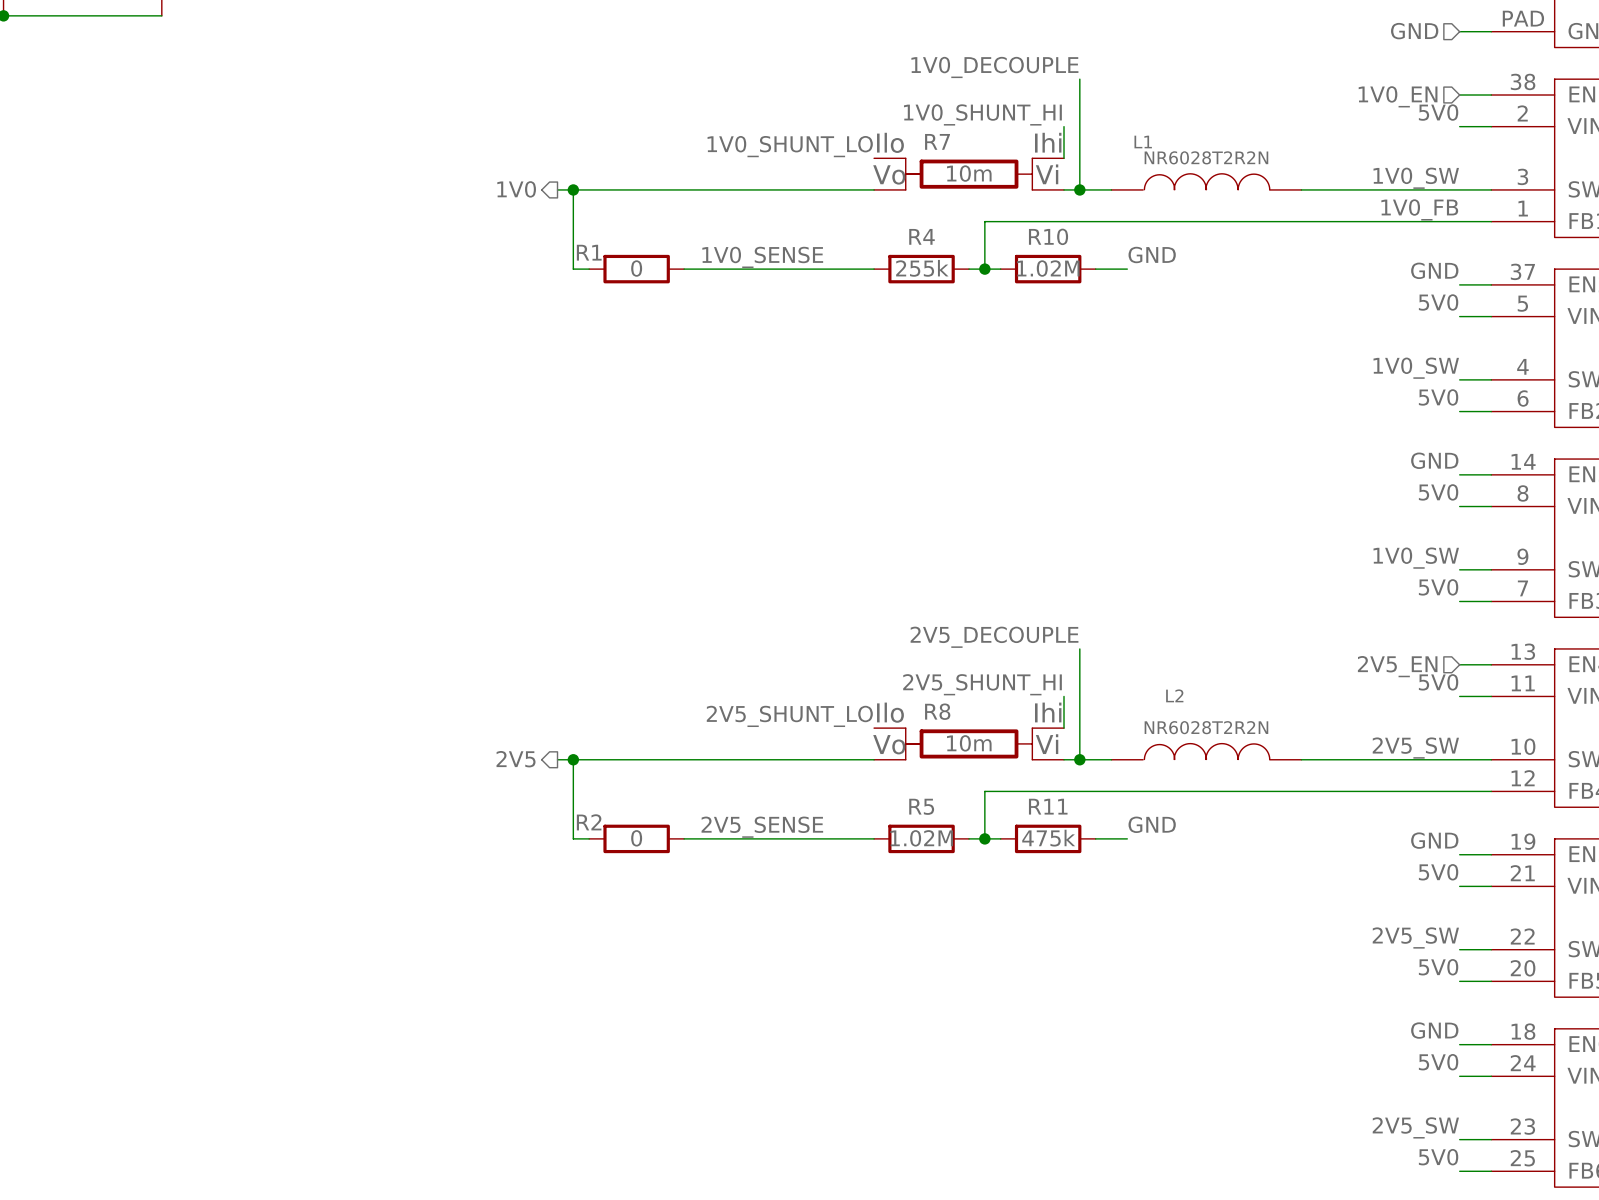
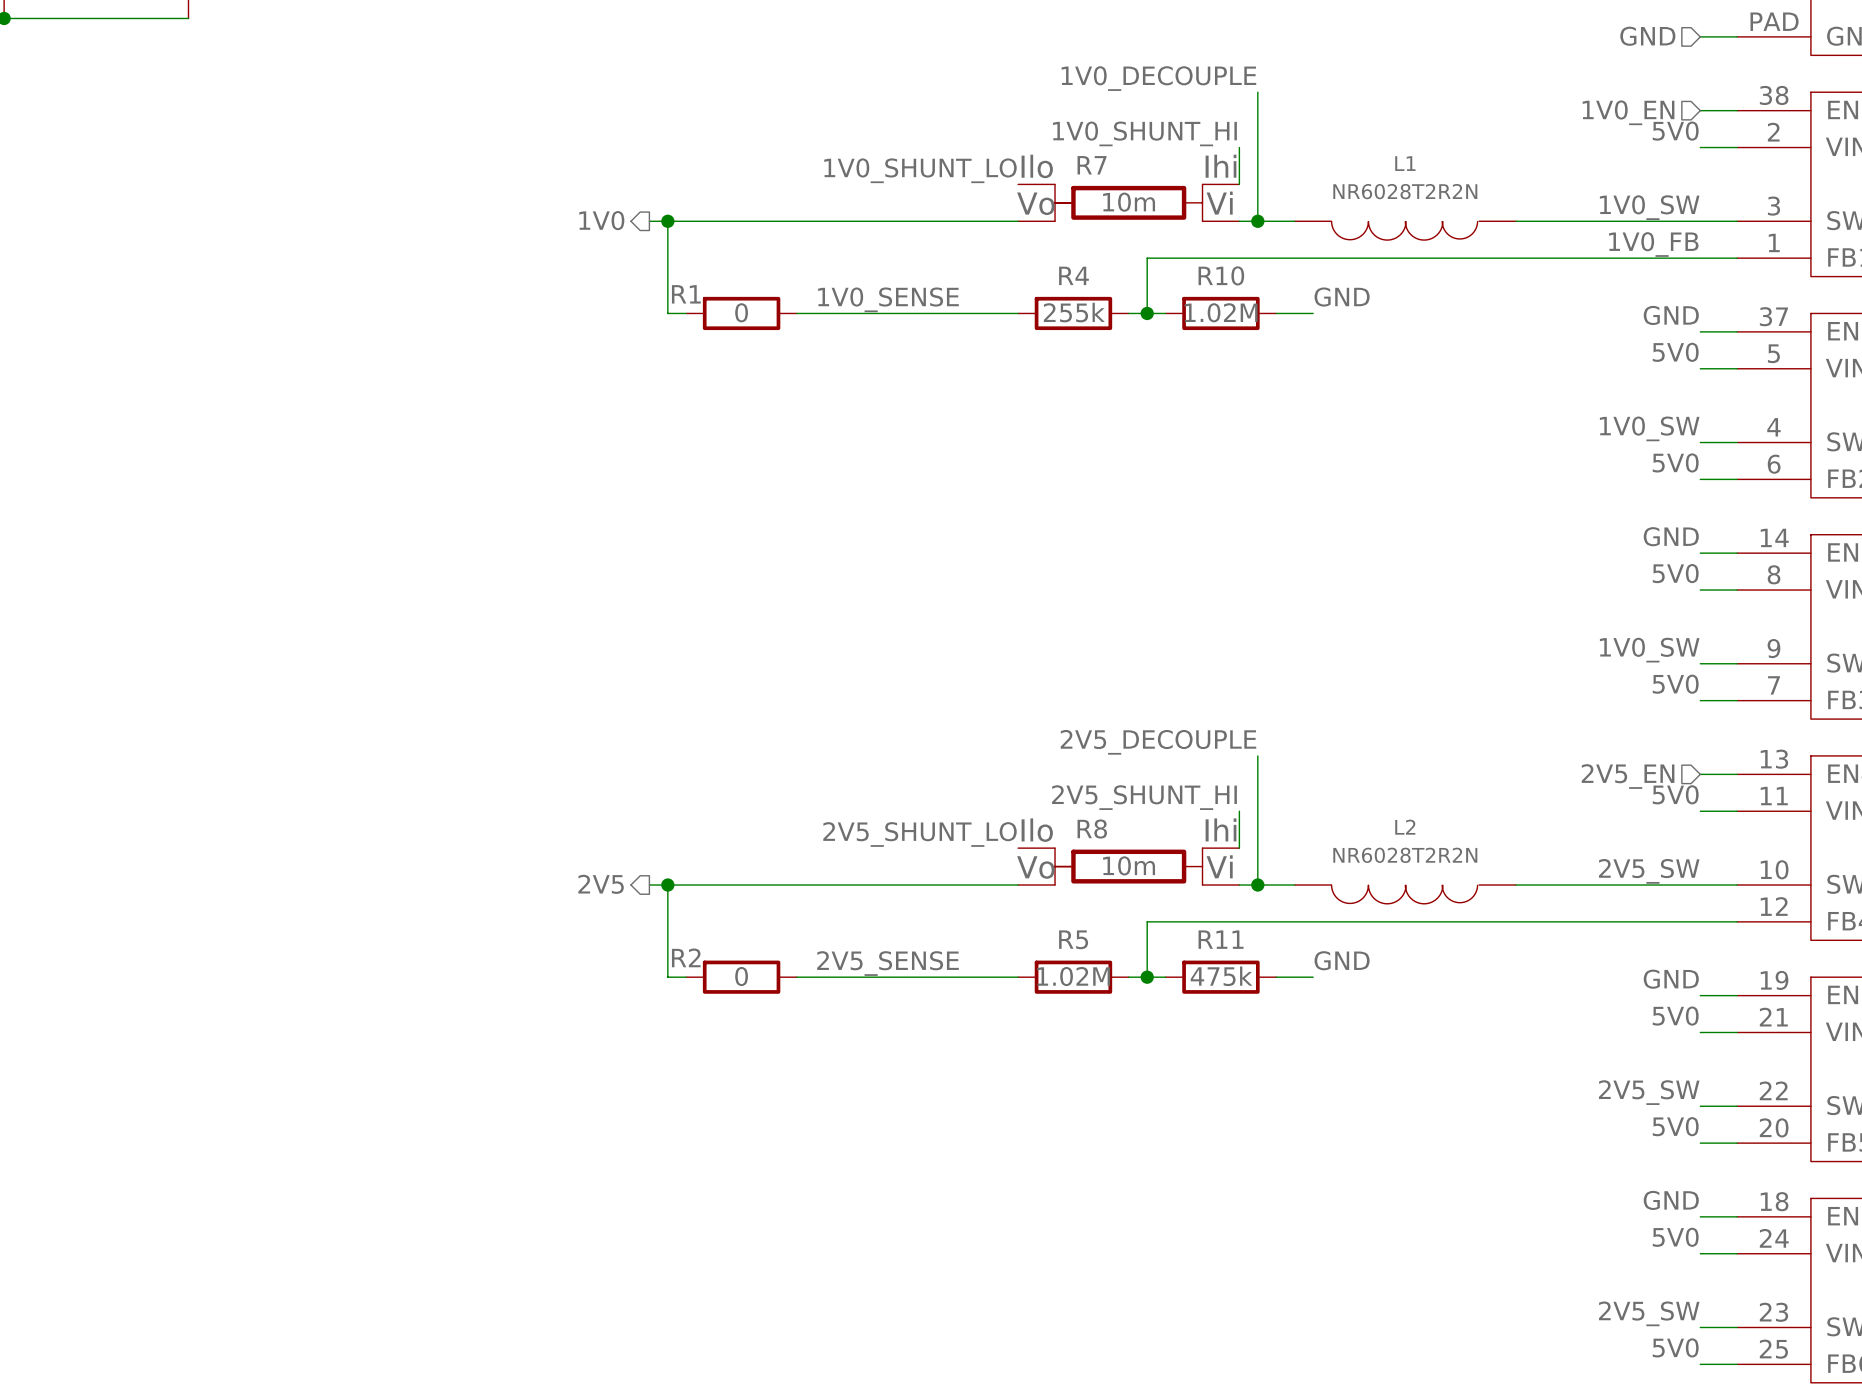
L1 name position: L1 (1143, 142) -> L1 (1405, 163)
L1 rotation: 0° (1207, 181) -> 180° (1404, 230)
L2 name position: L2 (1174, 695) -> L2 (1405, 827)
L2 rotation: 0° (1207, 751) -> 180° (1404, 894)

